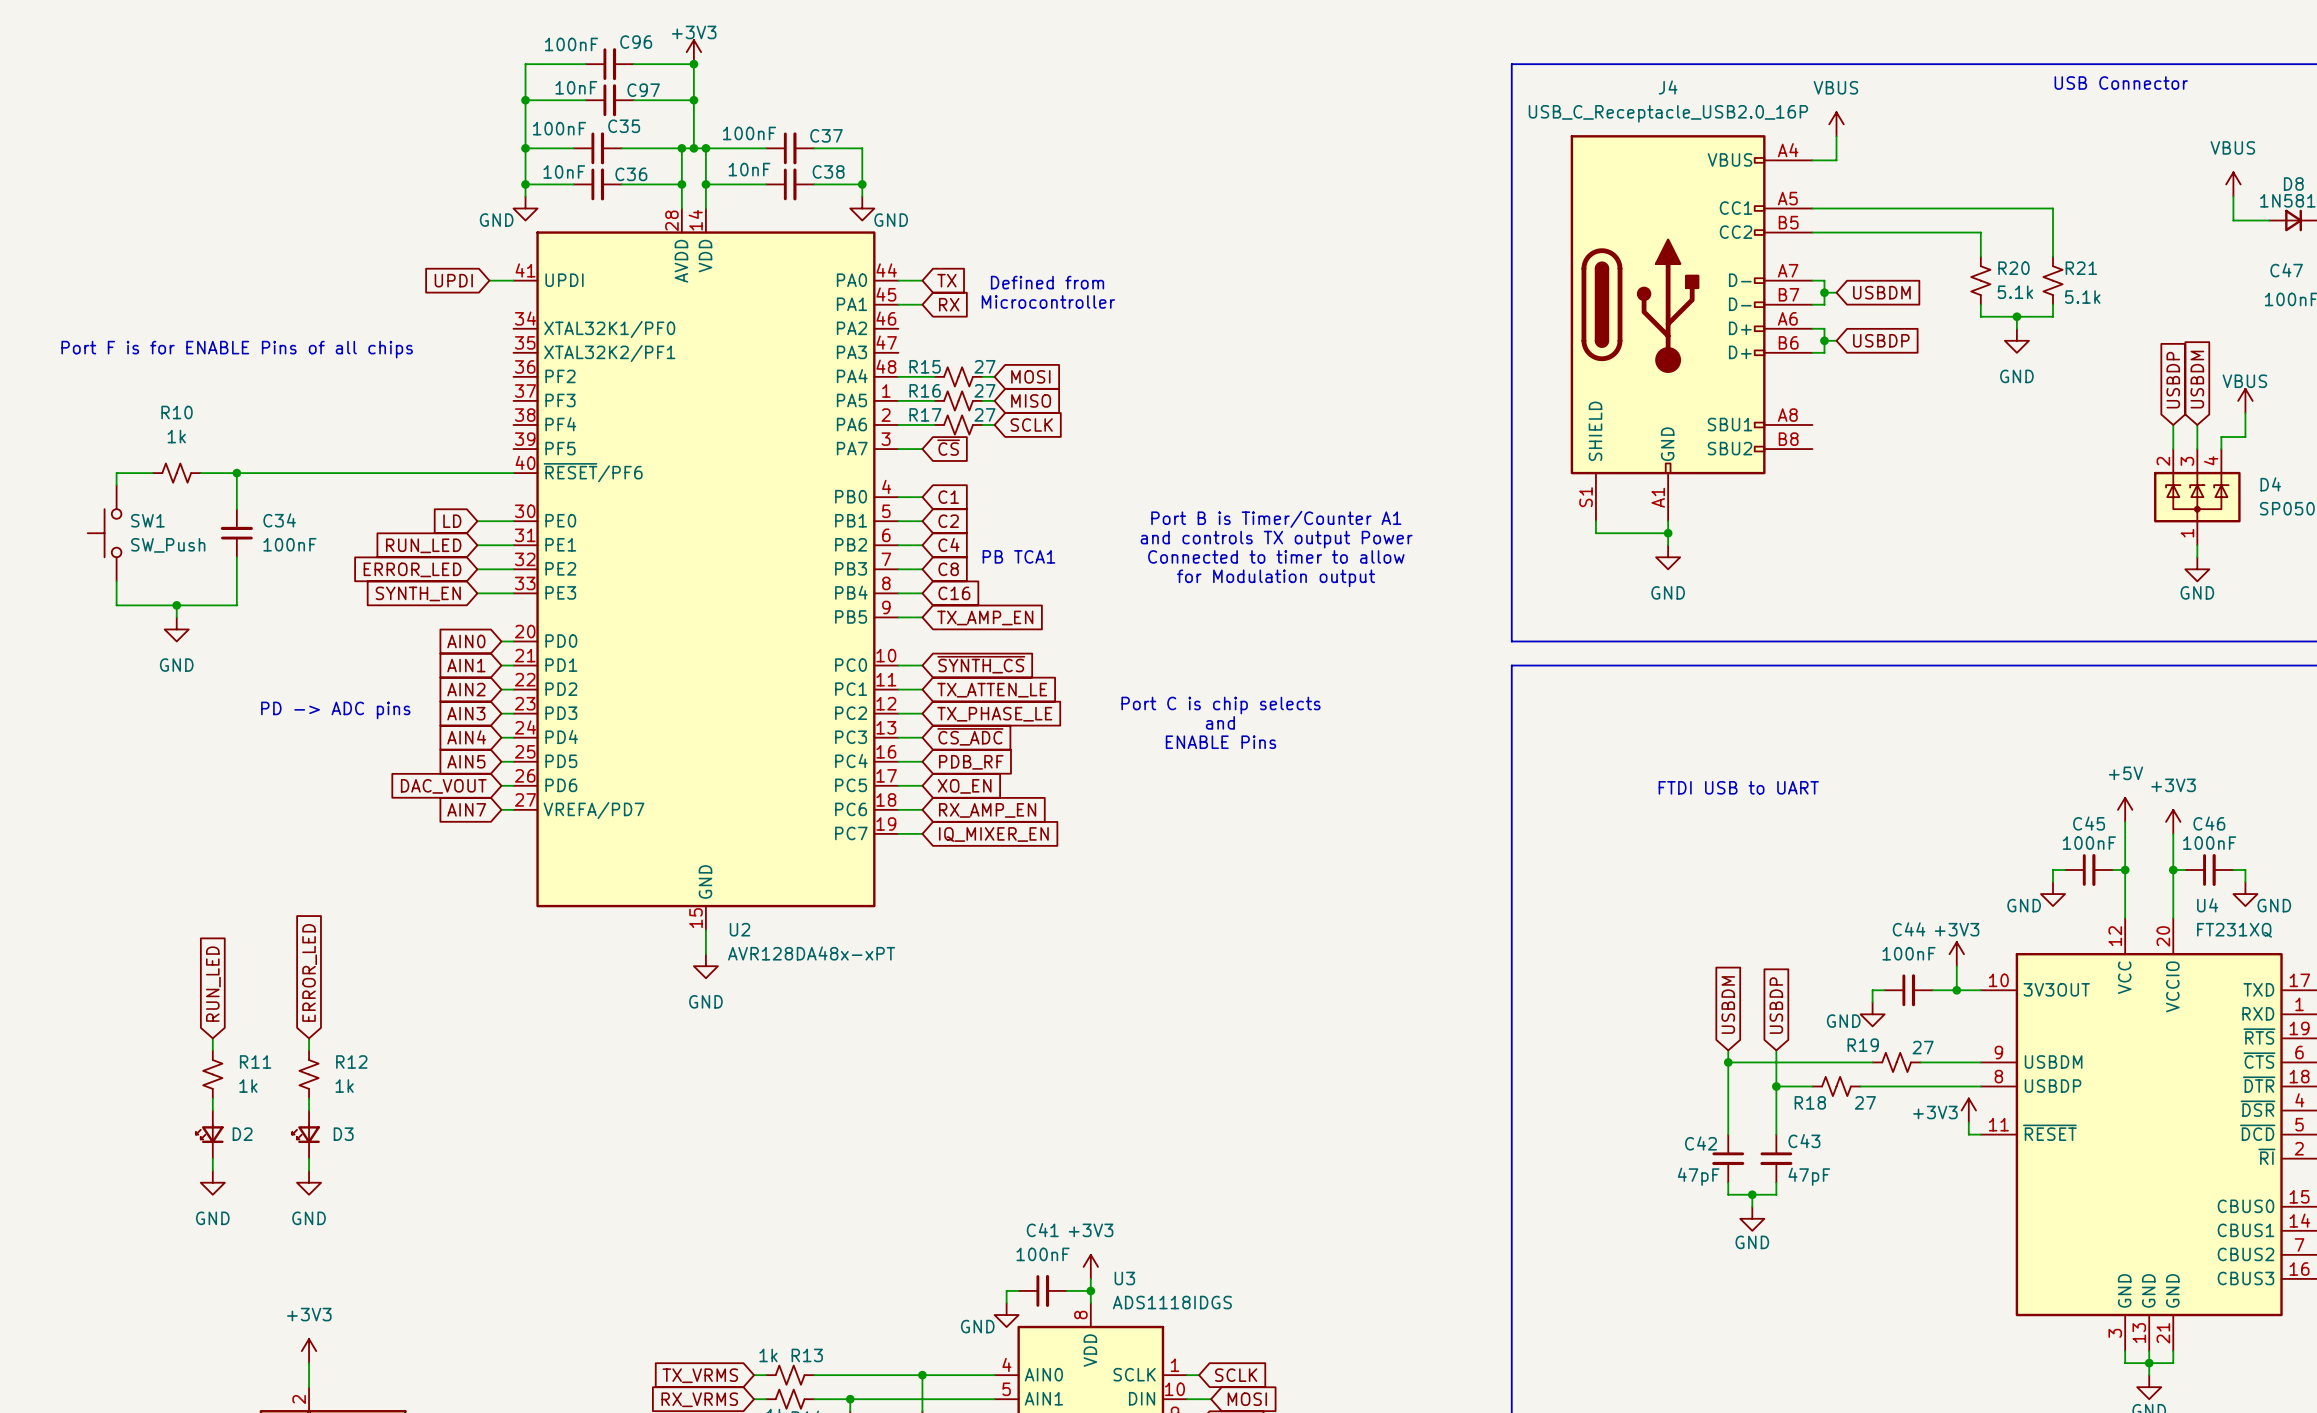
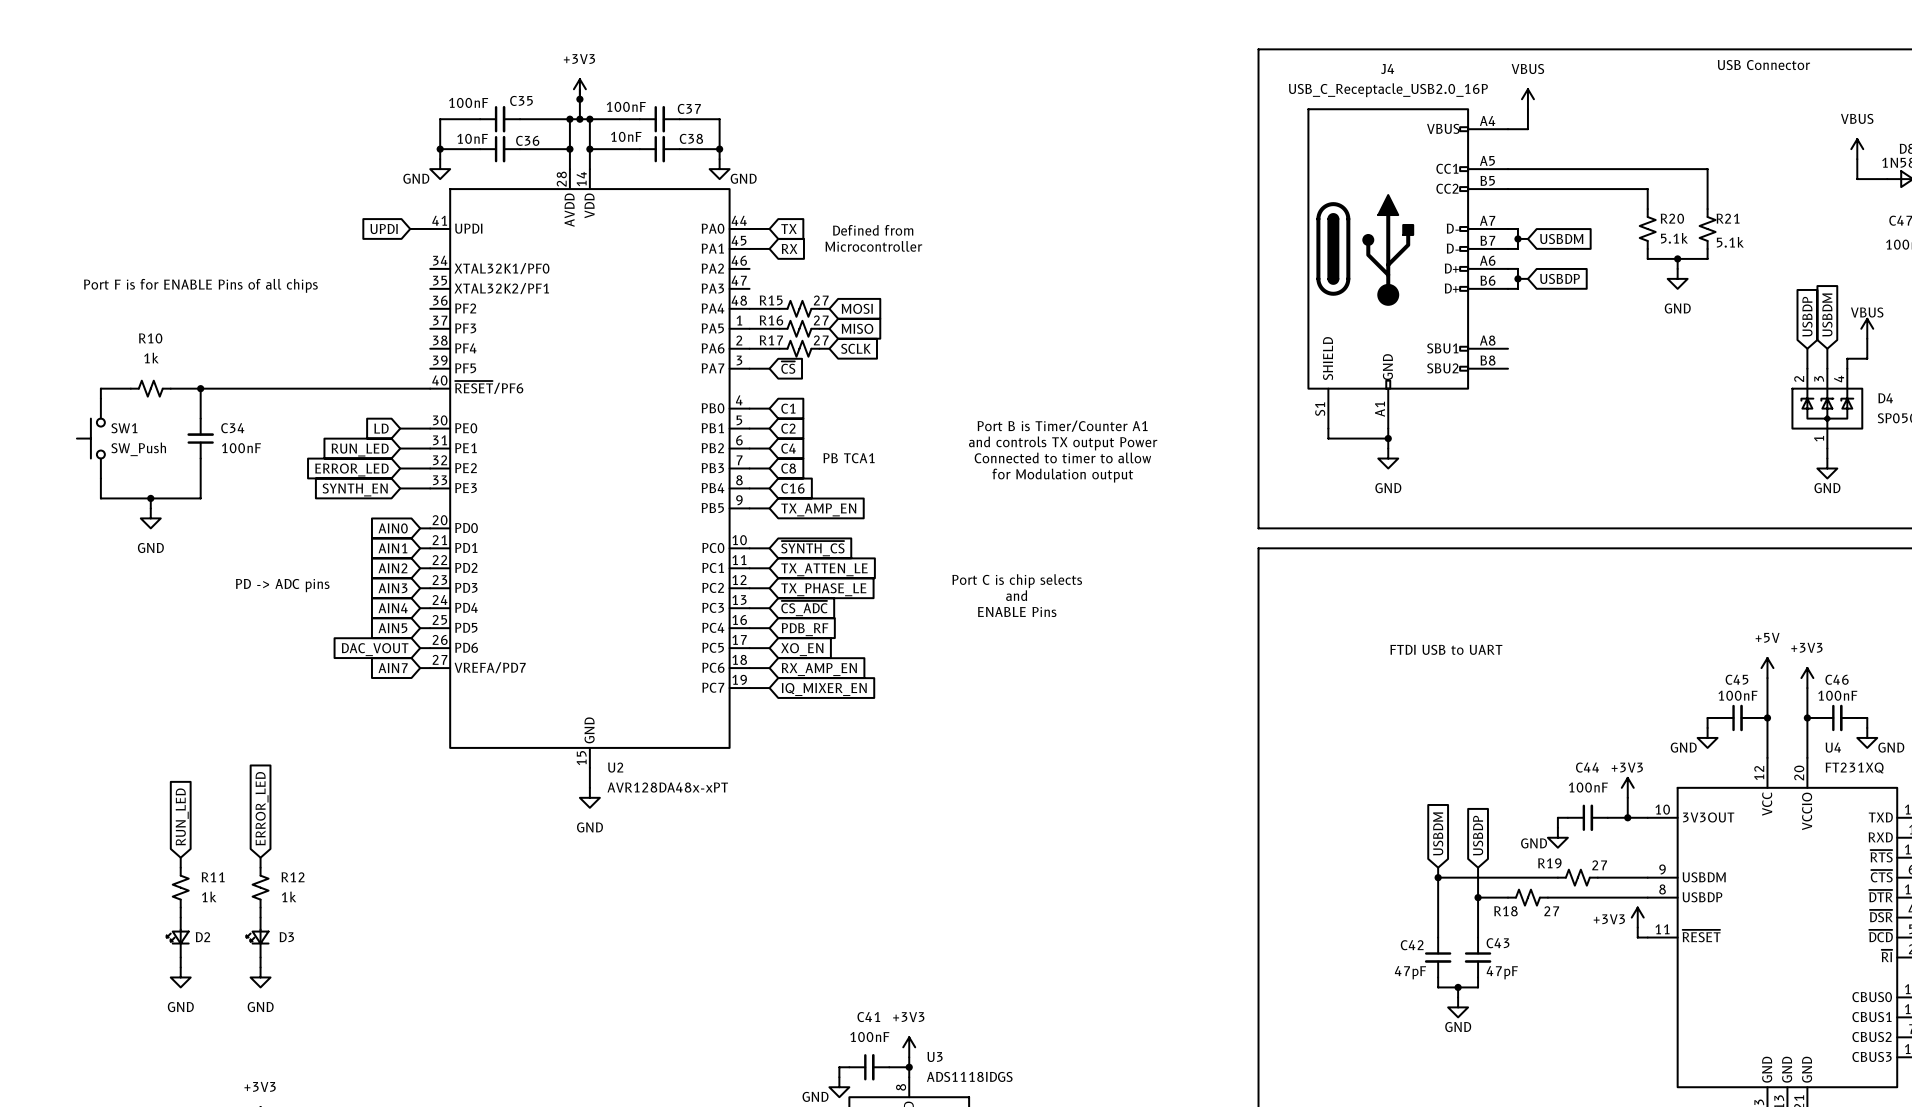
power symbol text position: +3V3 (694, 32) -> +3V3 (579, 59)
power symbol position: +3V3 (693, 52) -> +3V3 (579, 89)
wire: (585, 64) (525, 64) (525, 148) -> none
C96: 100nF (609, 64) -> none
wire: (633, 64) (693, 64) (693, 112) -> none
junction: (693, 64) -> none
wire: (525, 100) (585, 100) -> none
junction: (525, 100) -> none
C97: 10nF (609, 100) -> none
wire: (633, 100) (693, 100) -> none
junction position: (693, 100) -> (579, 99)
junction: (525, 148) -> none

